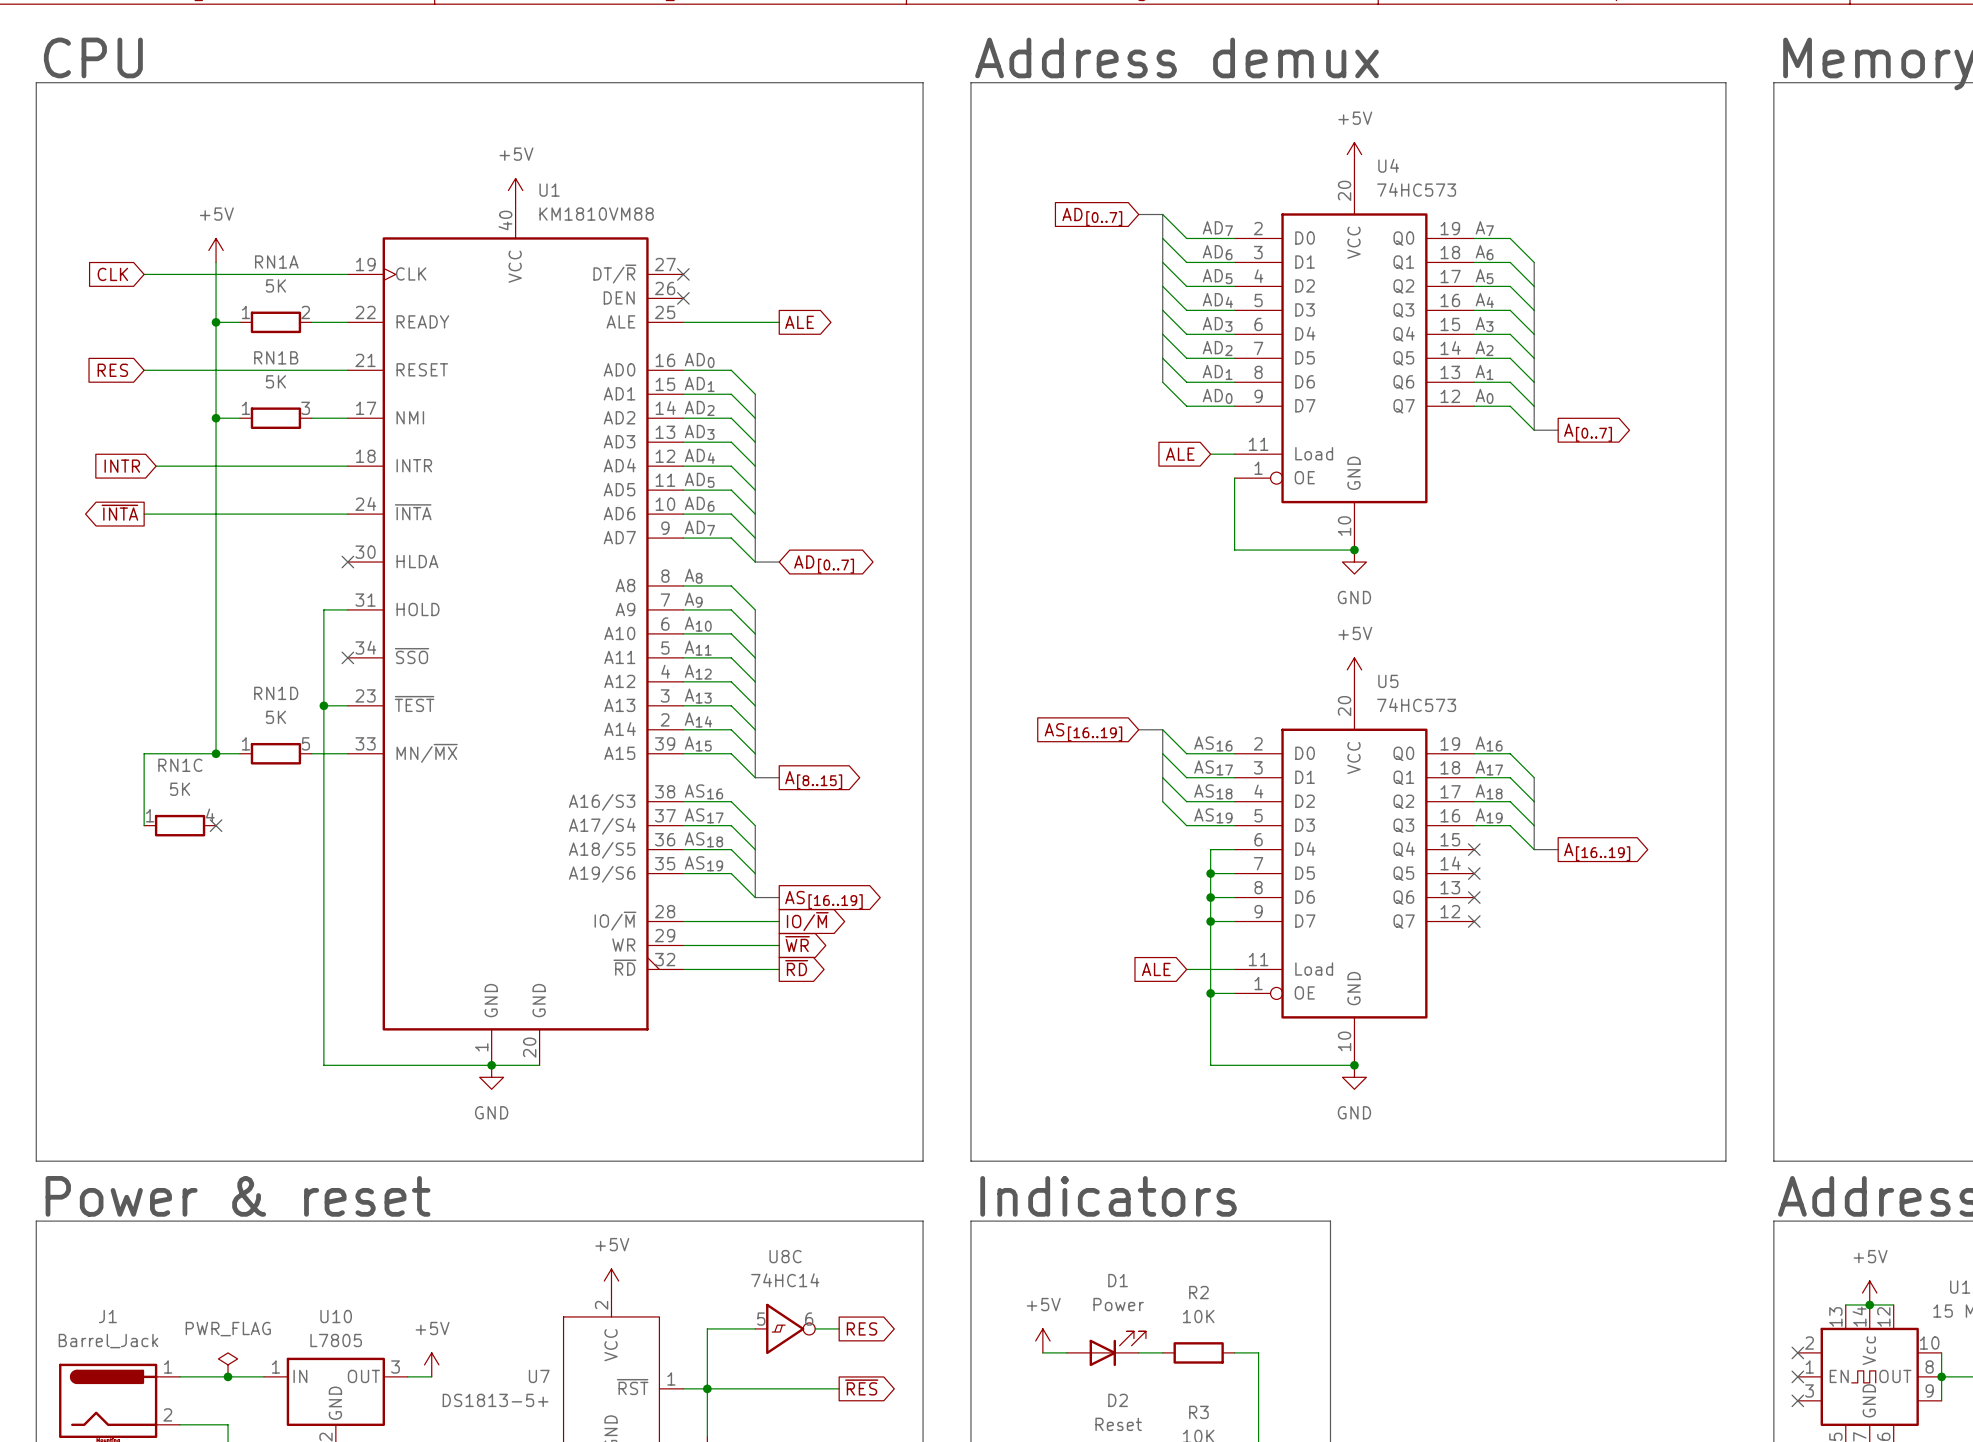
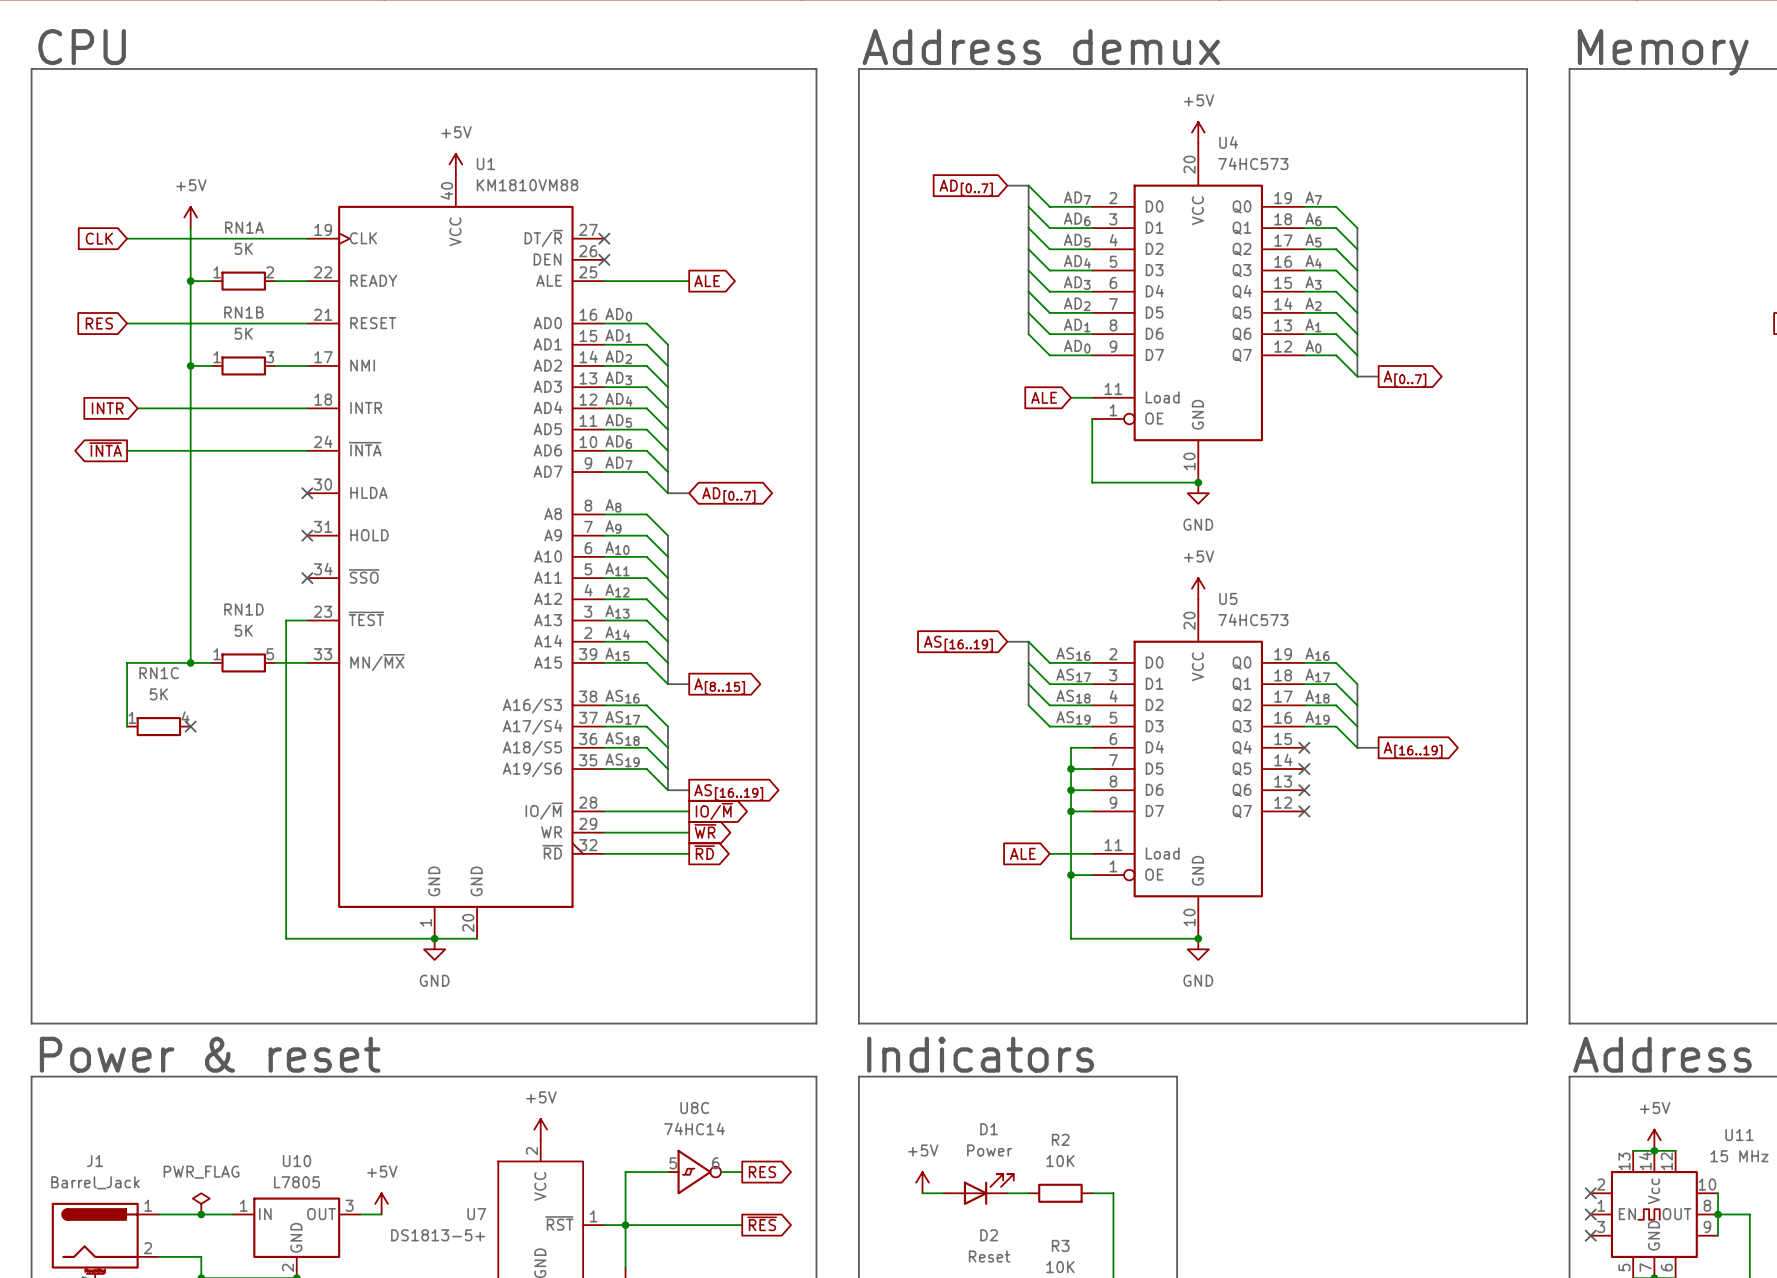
wire: (347, 609) (323, 609) (323, 705) -> none
no-connect mark: none -> (307, 535)
junction: (323, 705) -> none

